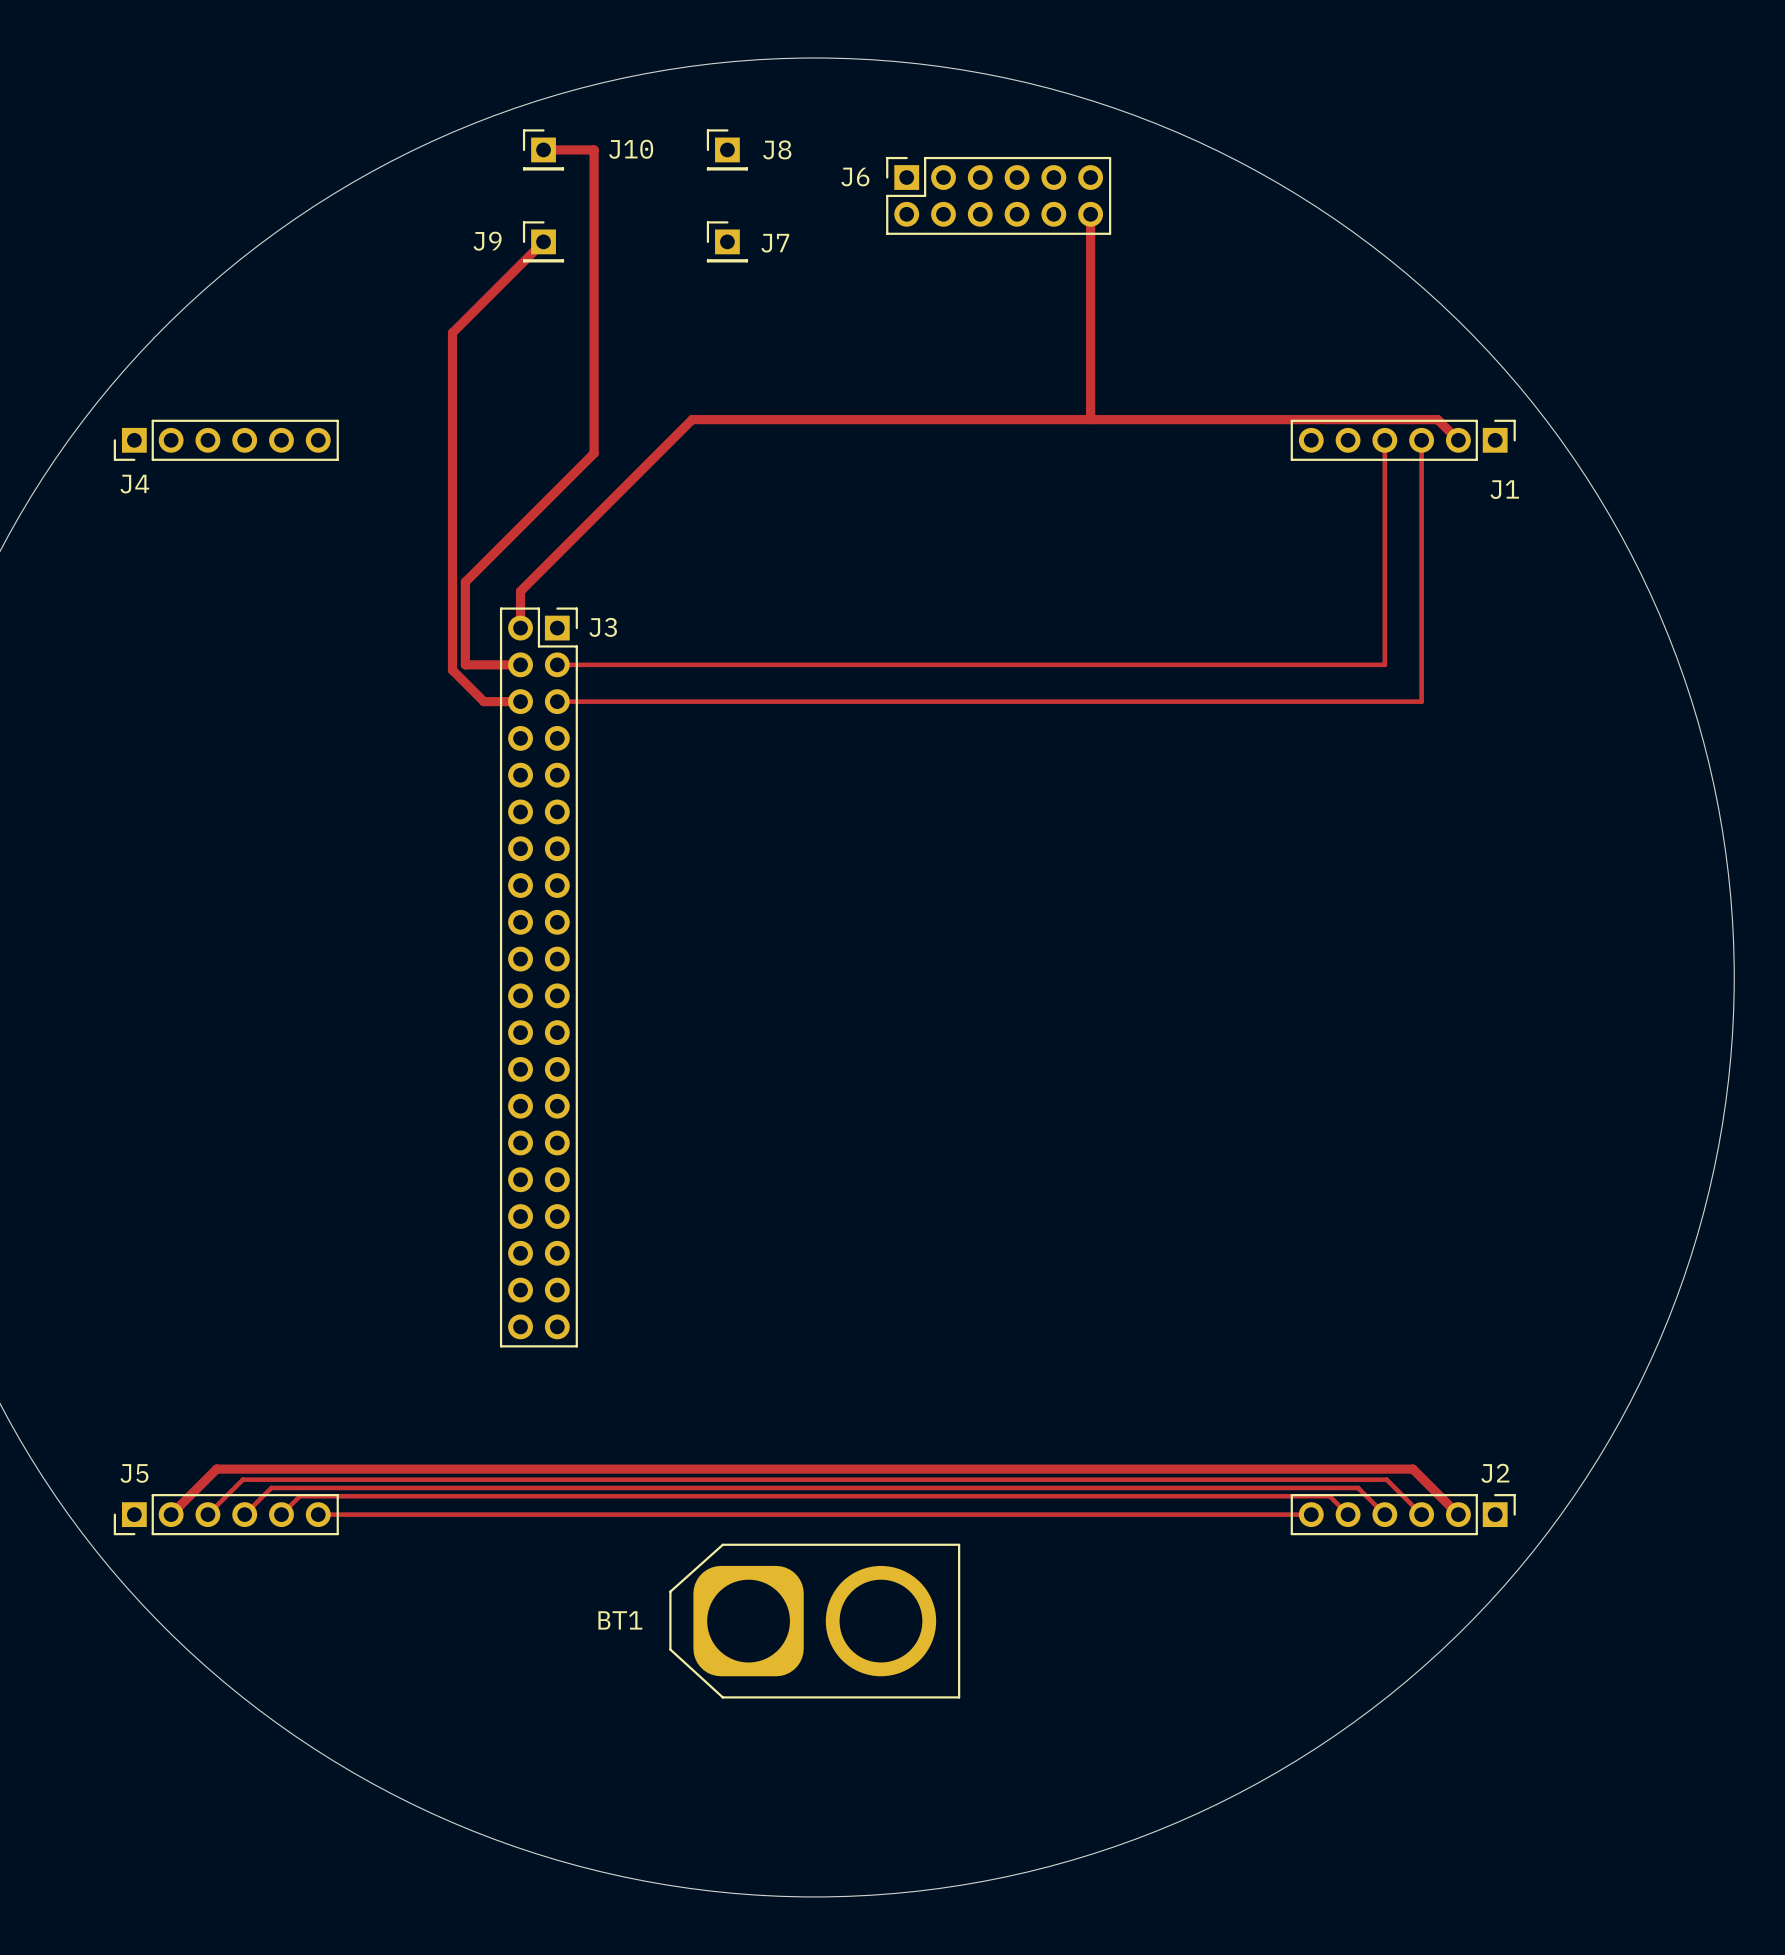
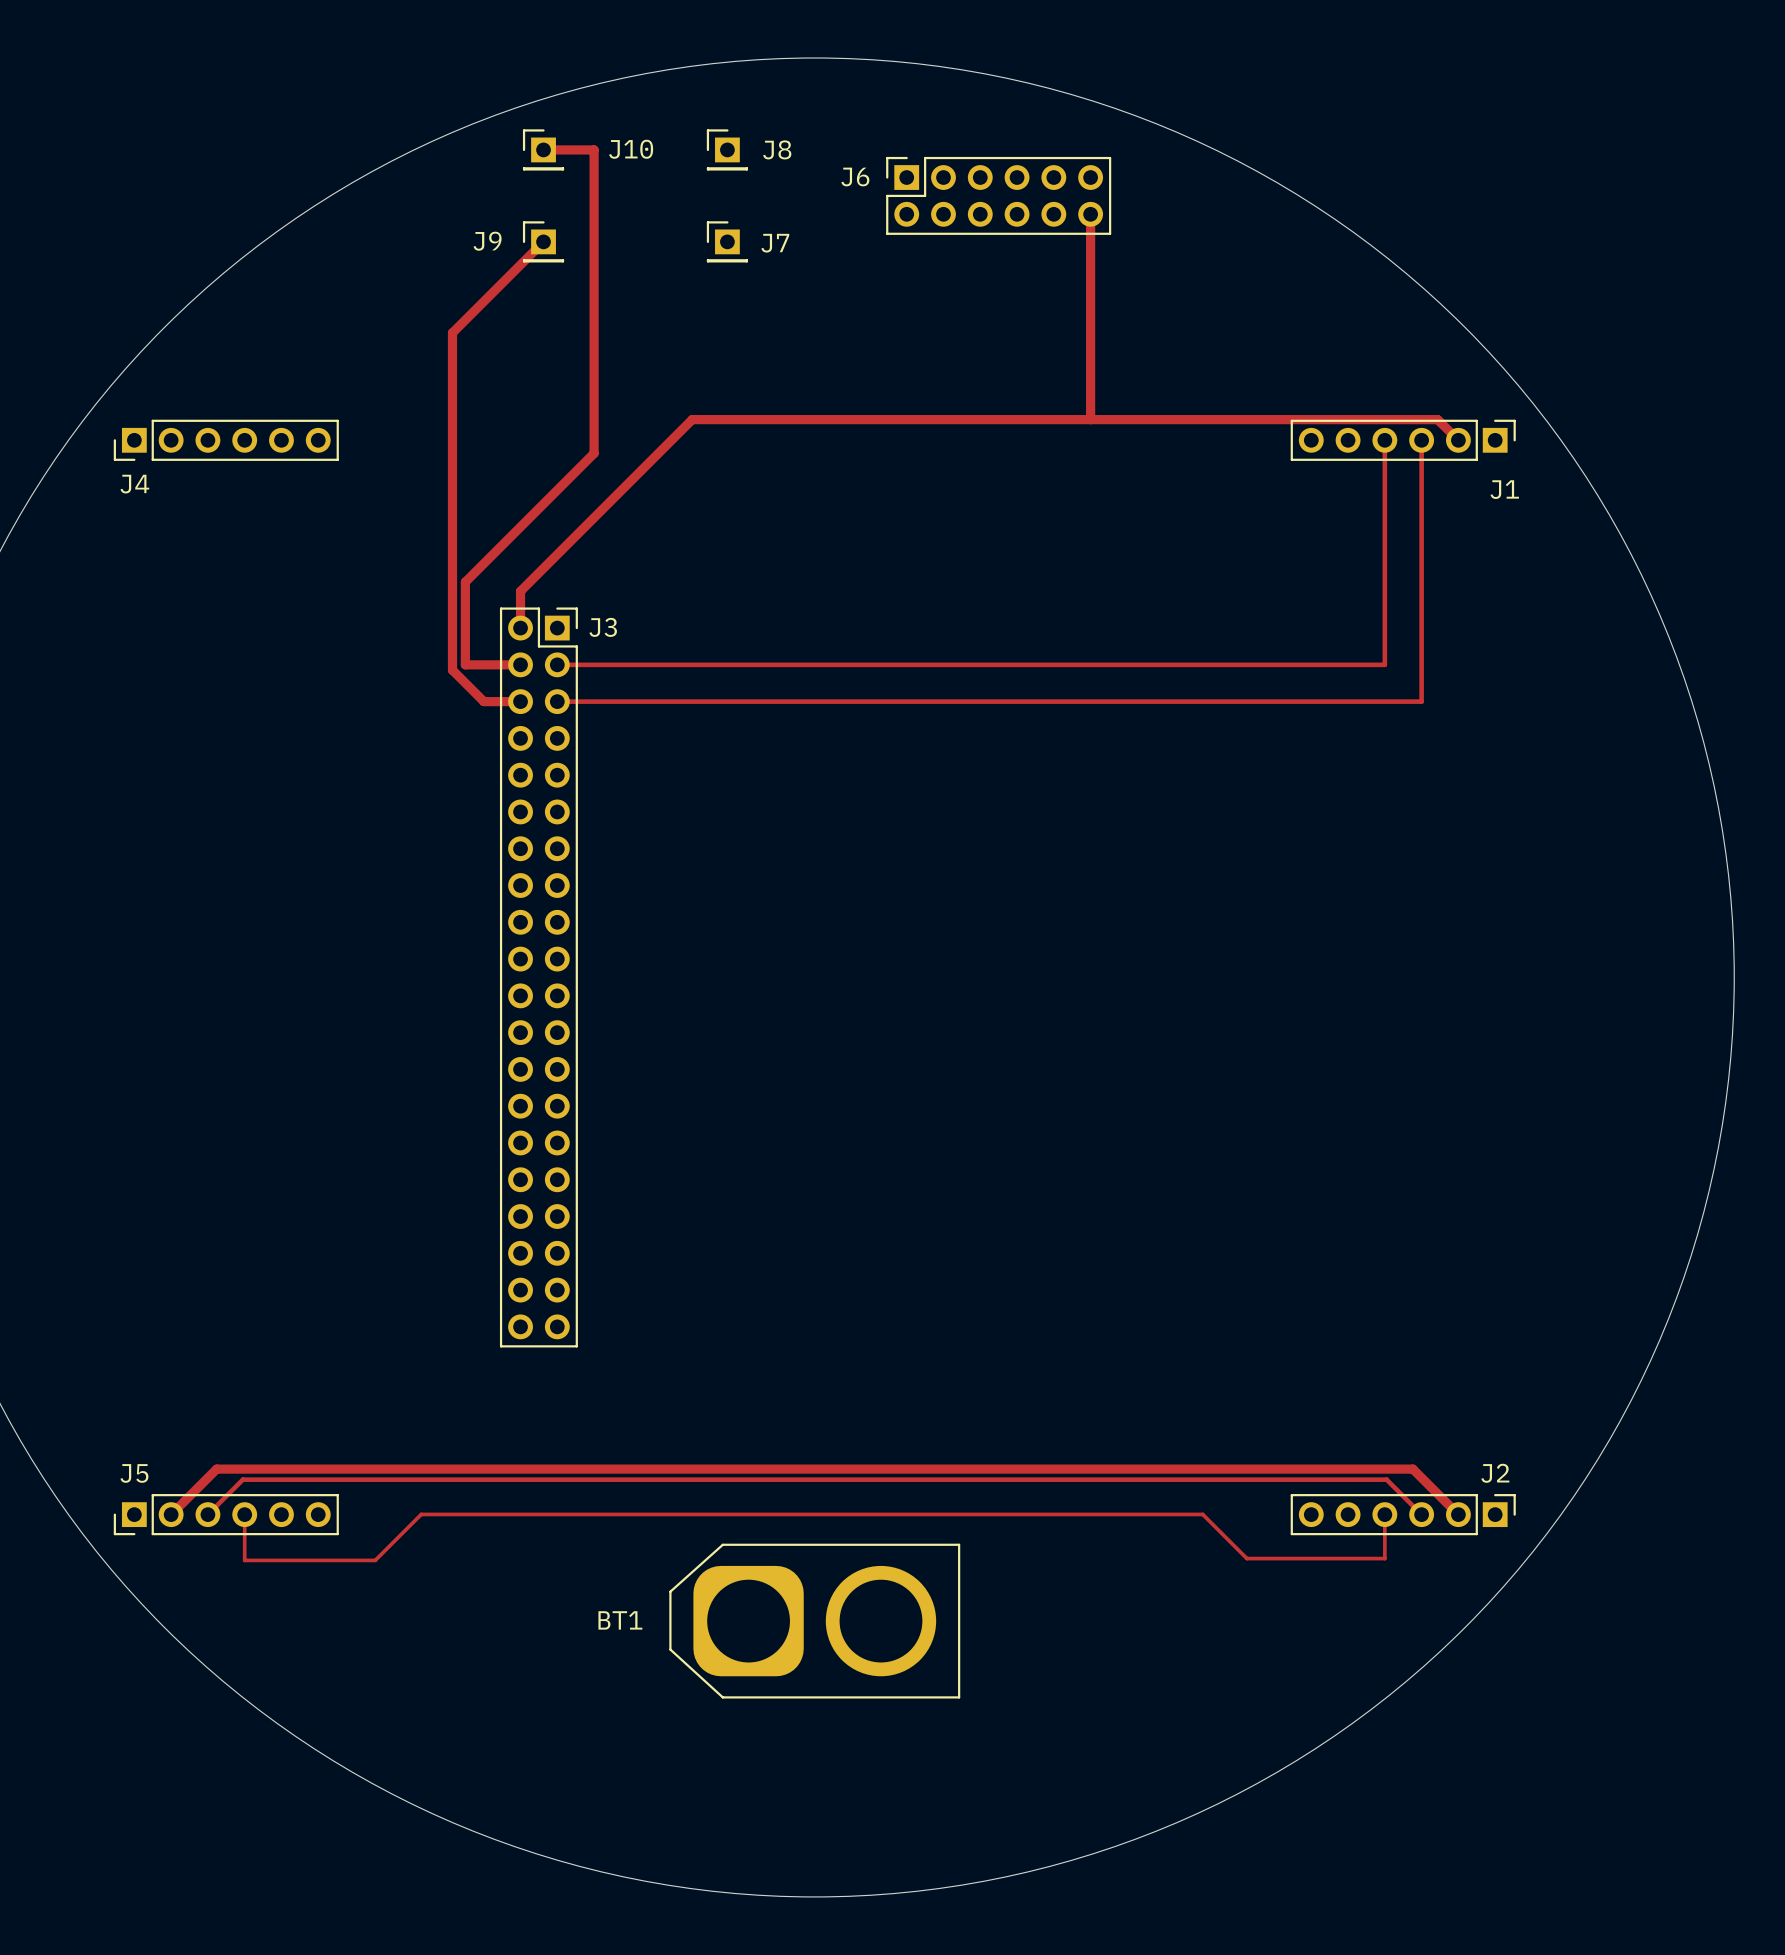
track: (244, 1514) (271, 1487) (1358, 1487) (1384, 1514) -> (244, 1514) (244, 1560) (375, 1560) (421, 1514) (1202, 1514) (1246, 1558) (1384, 1558) (1384, 1514)
track: (281, 1514) (299, 1496) (1329, 1496) (1348, 1514) -> none
track: (318, 1514) (1311, 1514) -> none

